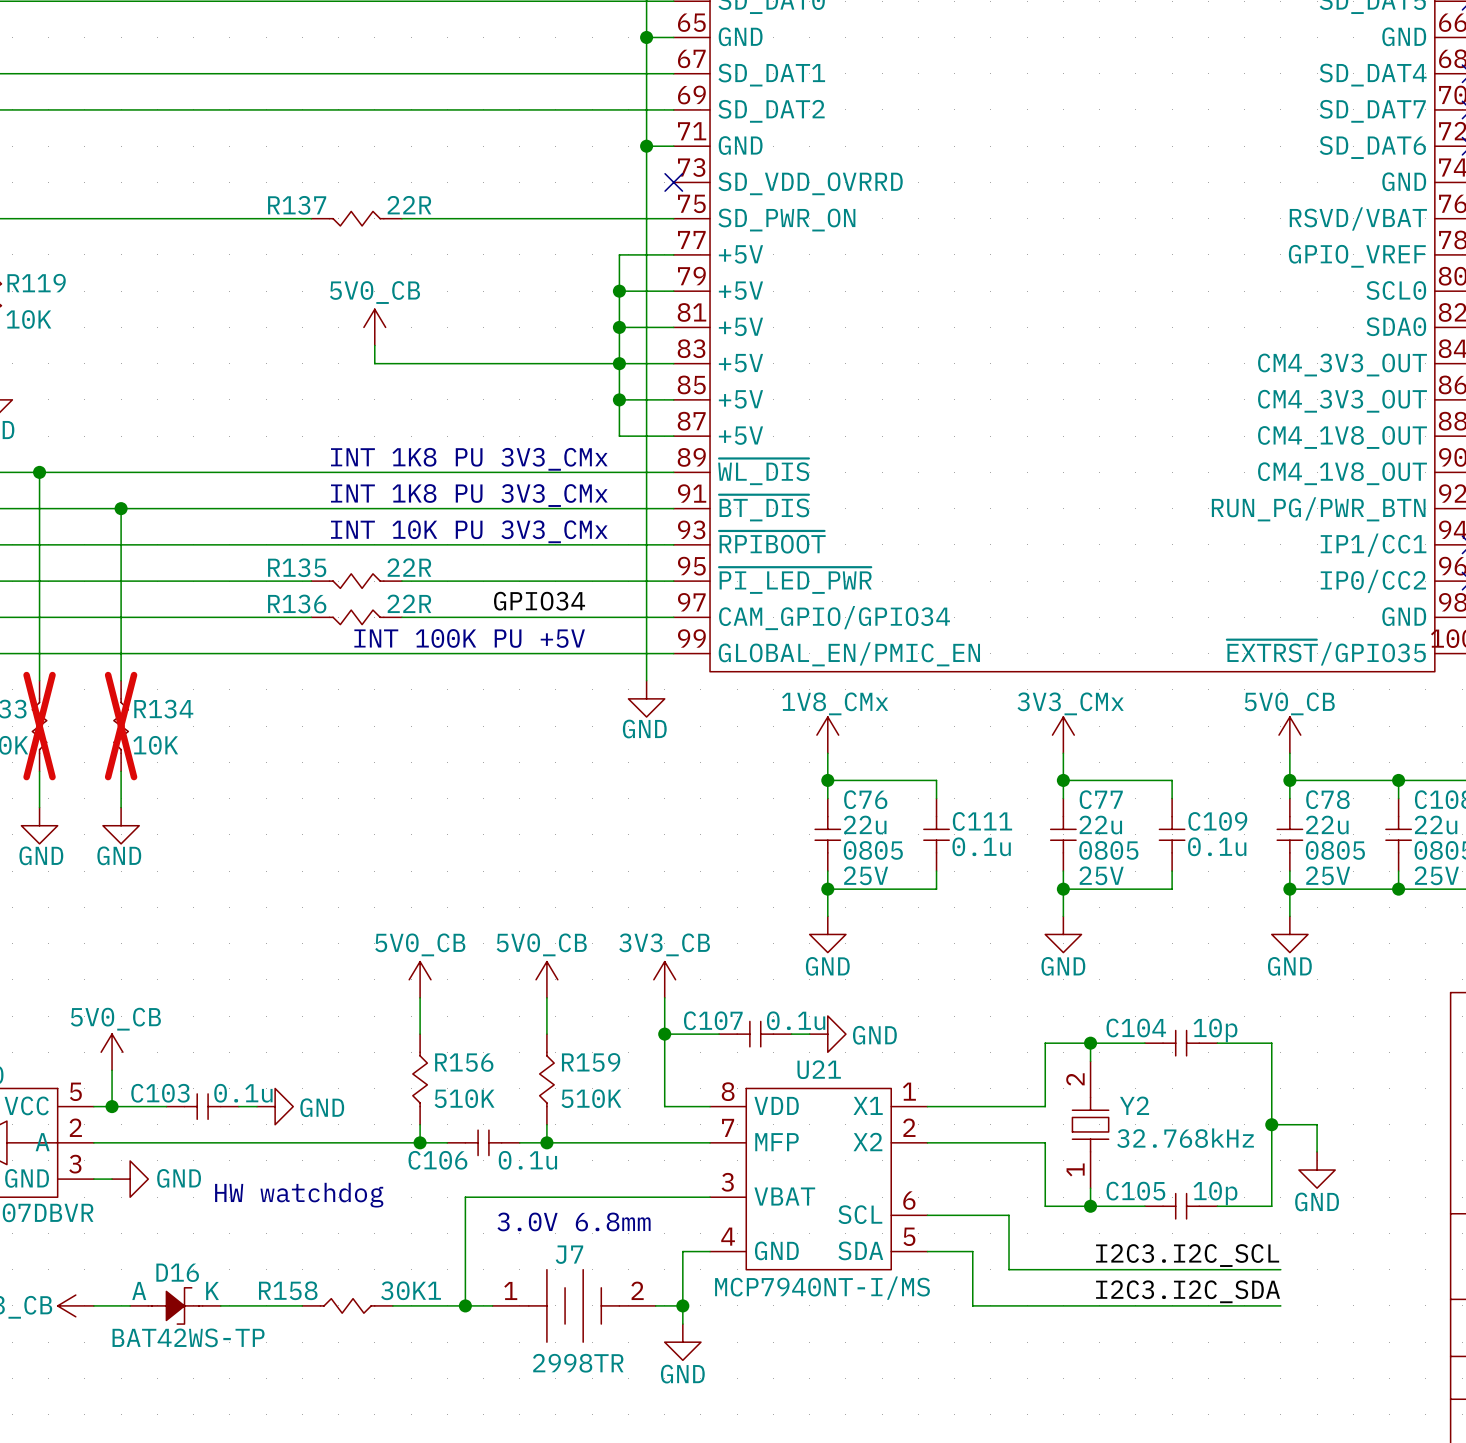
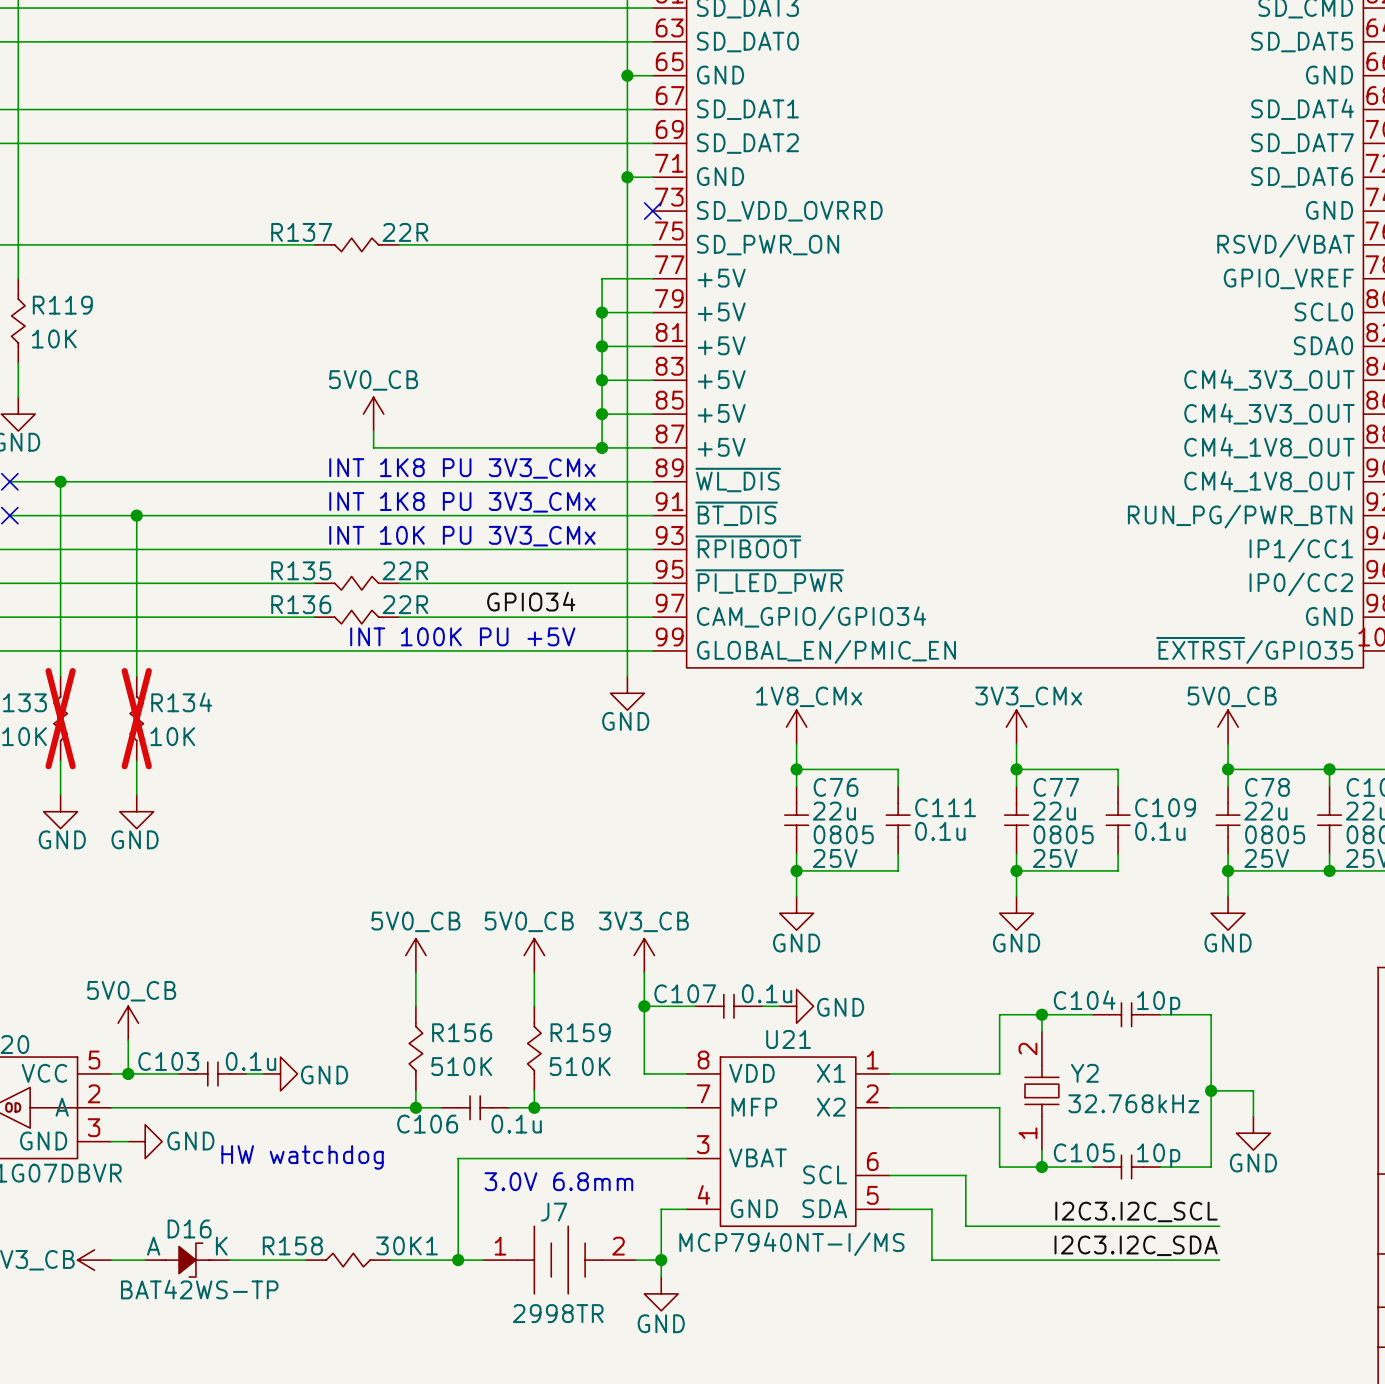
power symbol position: 5V0_CB (374, 327) -> 5V0_CB (373, 414)
wire: (374, 345) (374, 363) (619, 363) -> (373, 431) (373, 447) (602, 447)
junction: none -> (602, 447)

